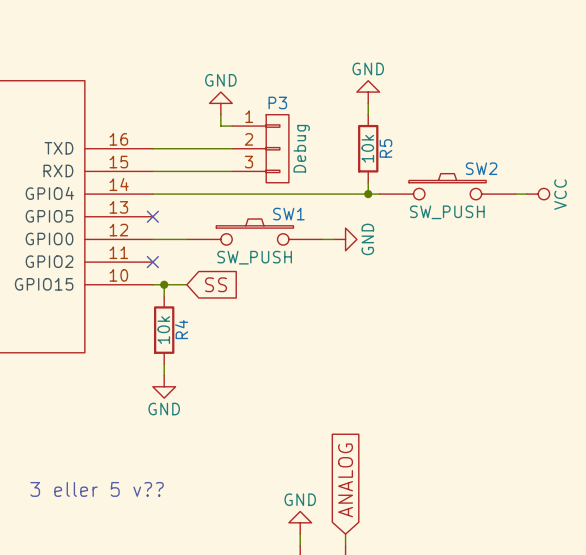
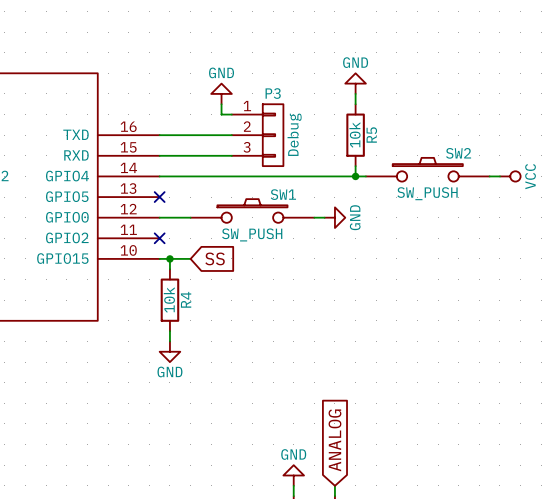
text: 3 eller 5 v?? (97, 489) -> none

